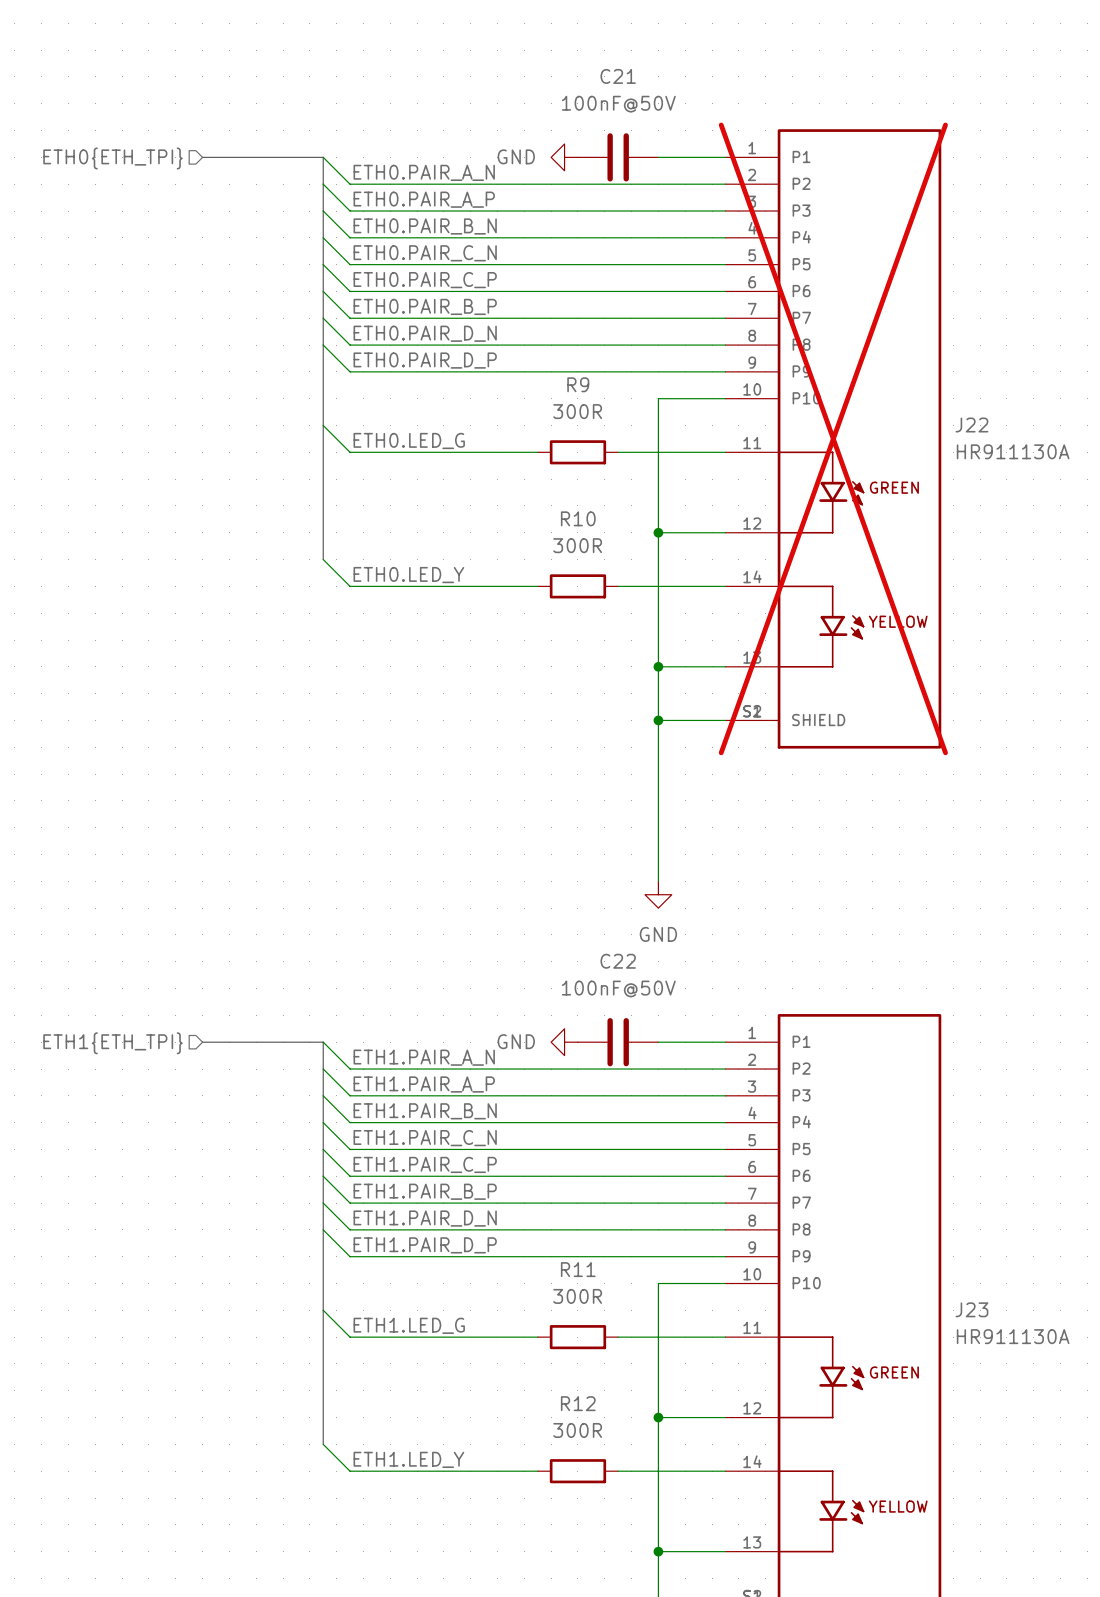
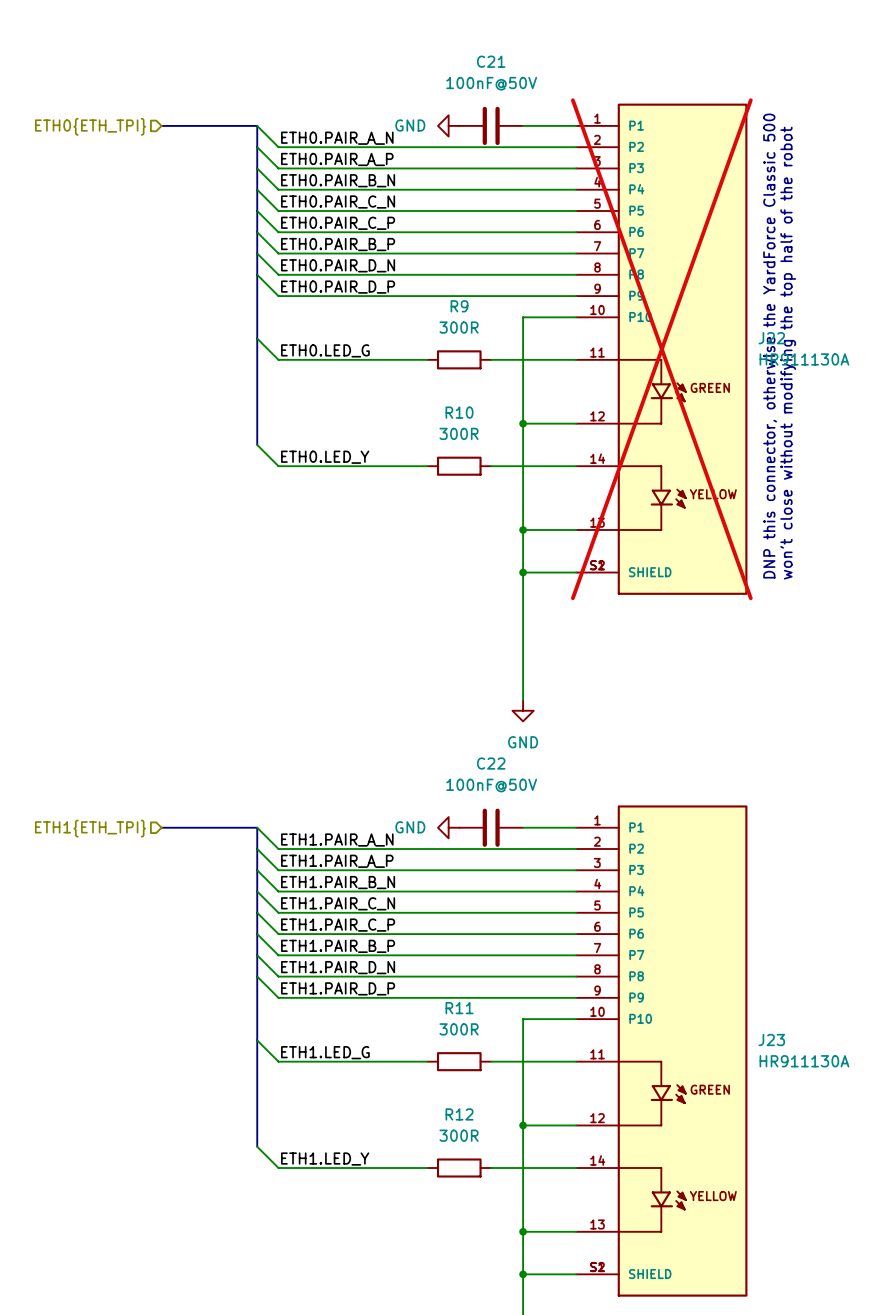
text: none -> DNP this connector, otherwise the YardForce Classic 500 (770, 346)
text: none -> won't close without modifying the top half of the robot (788, 353)

